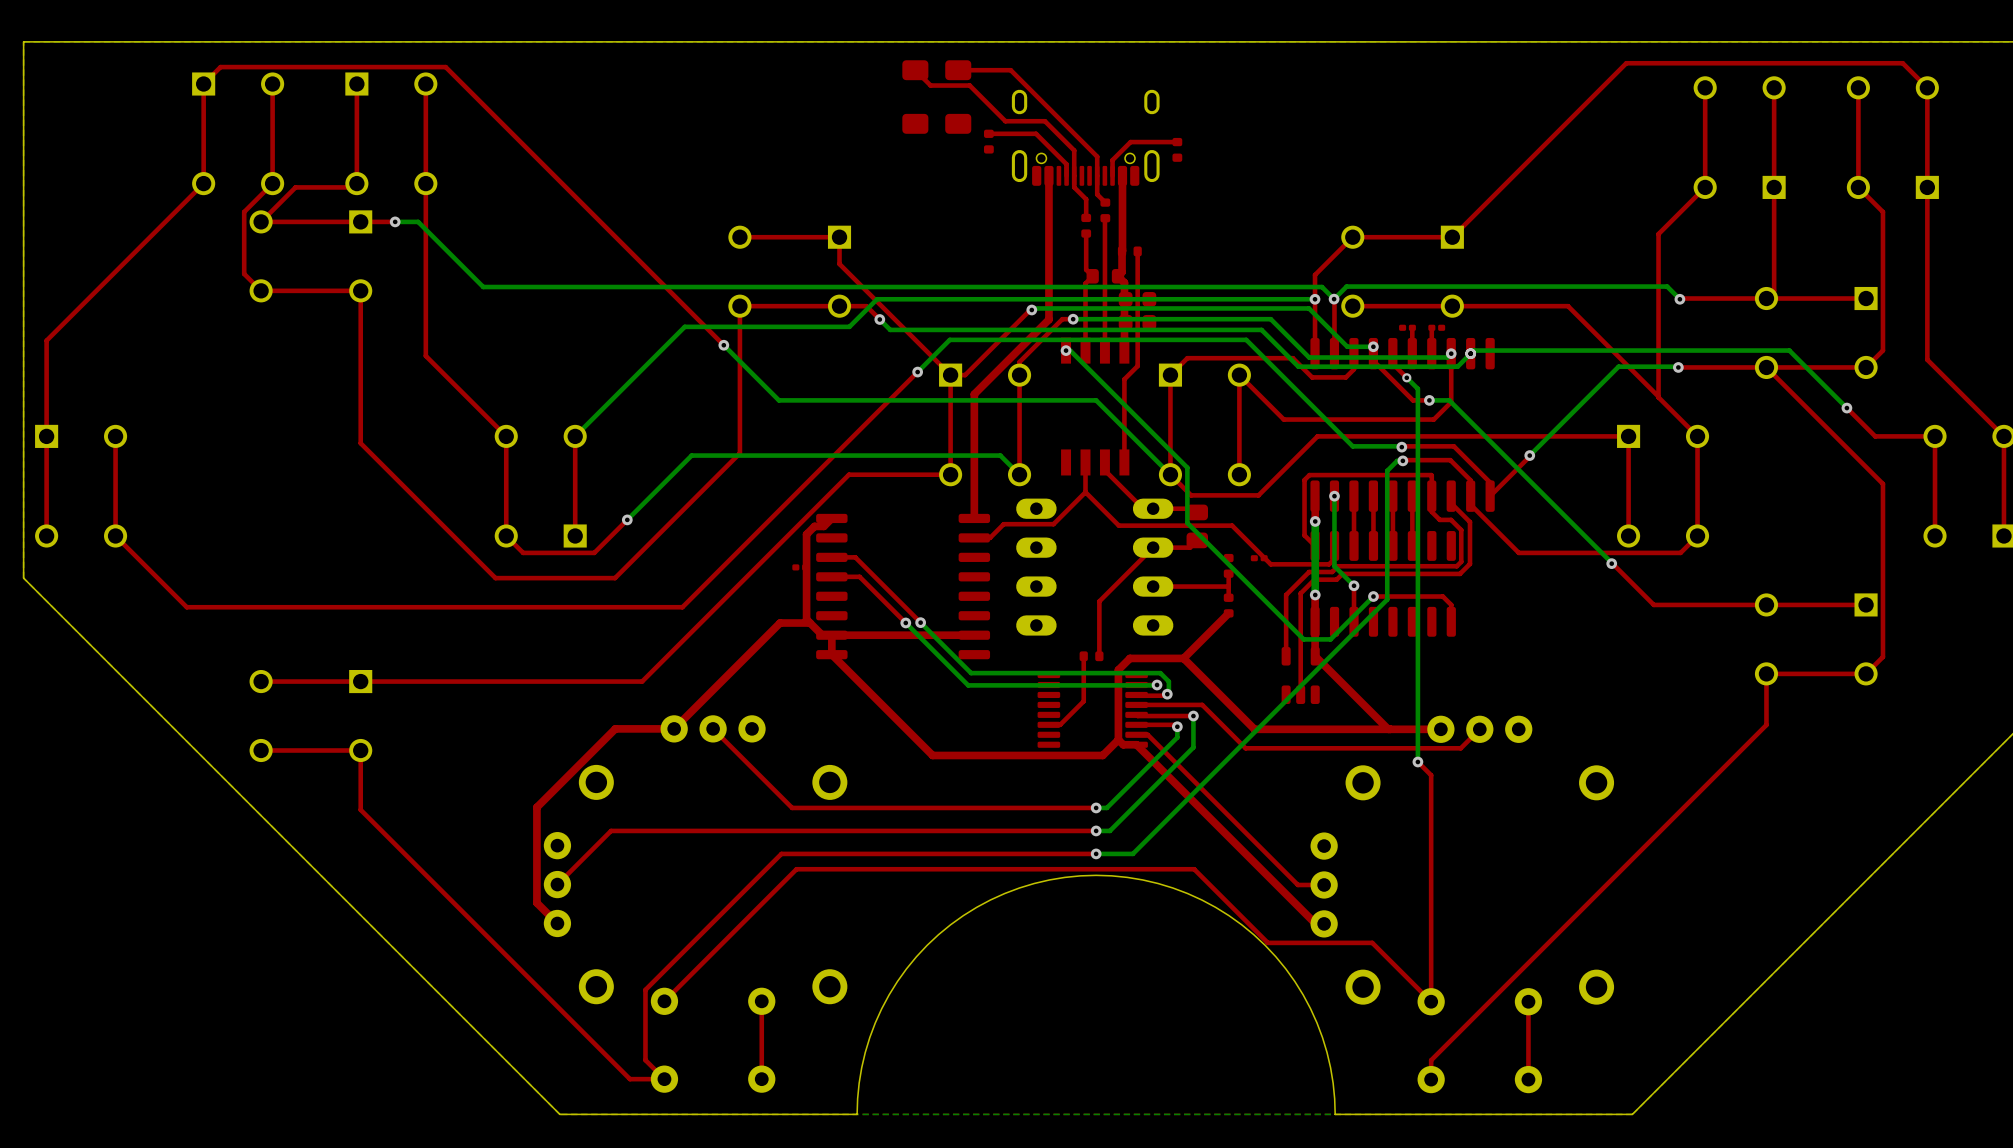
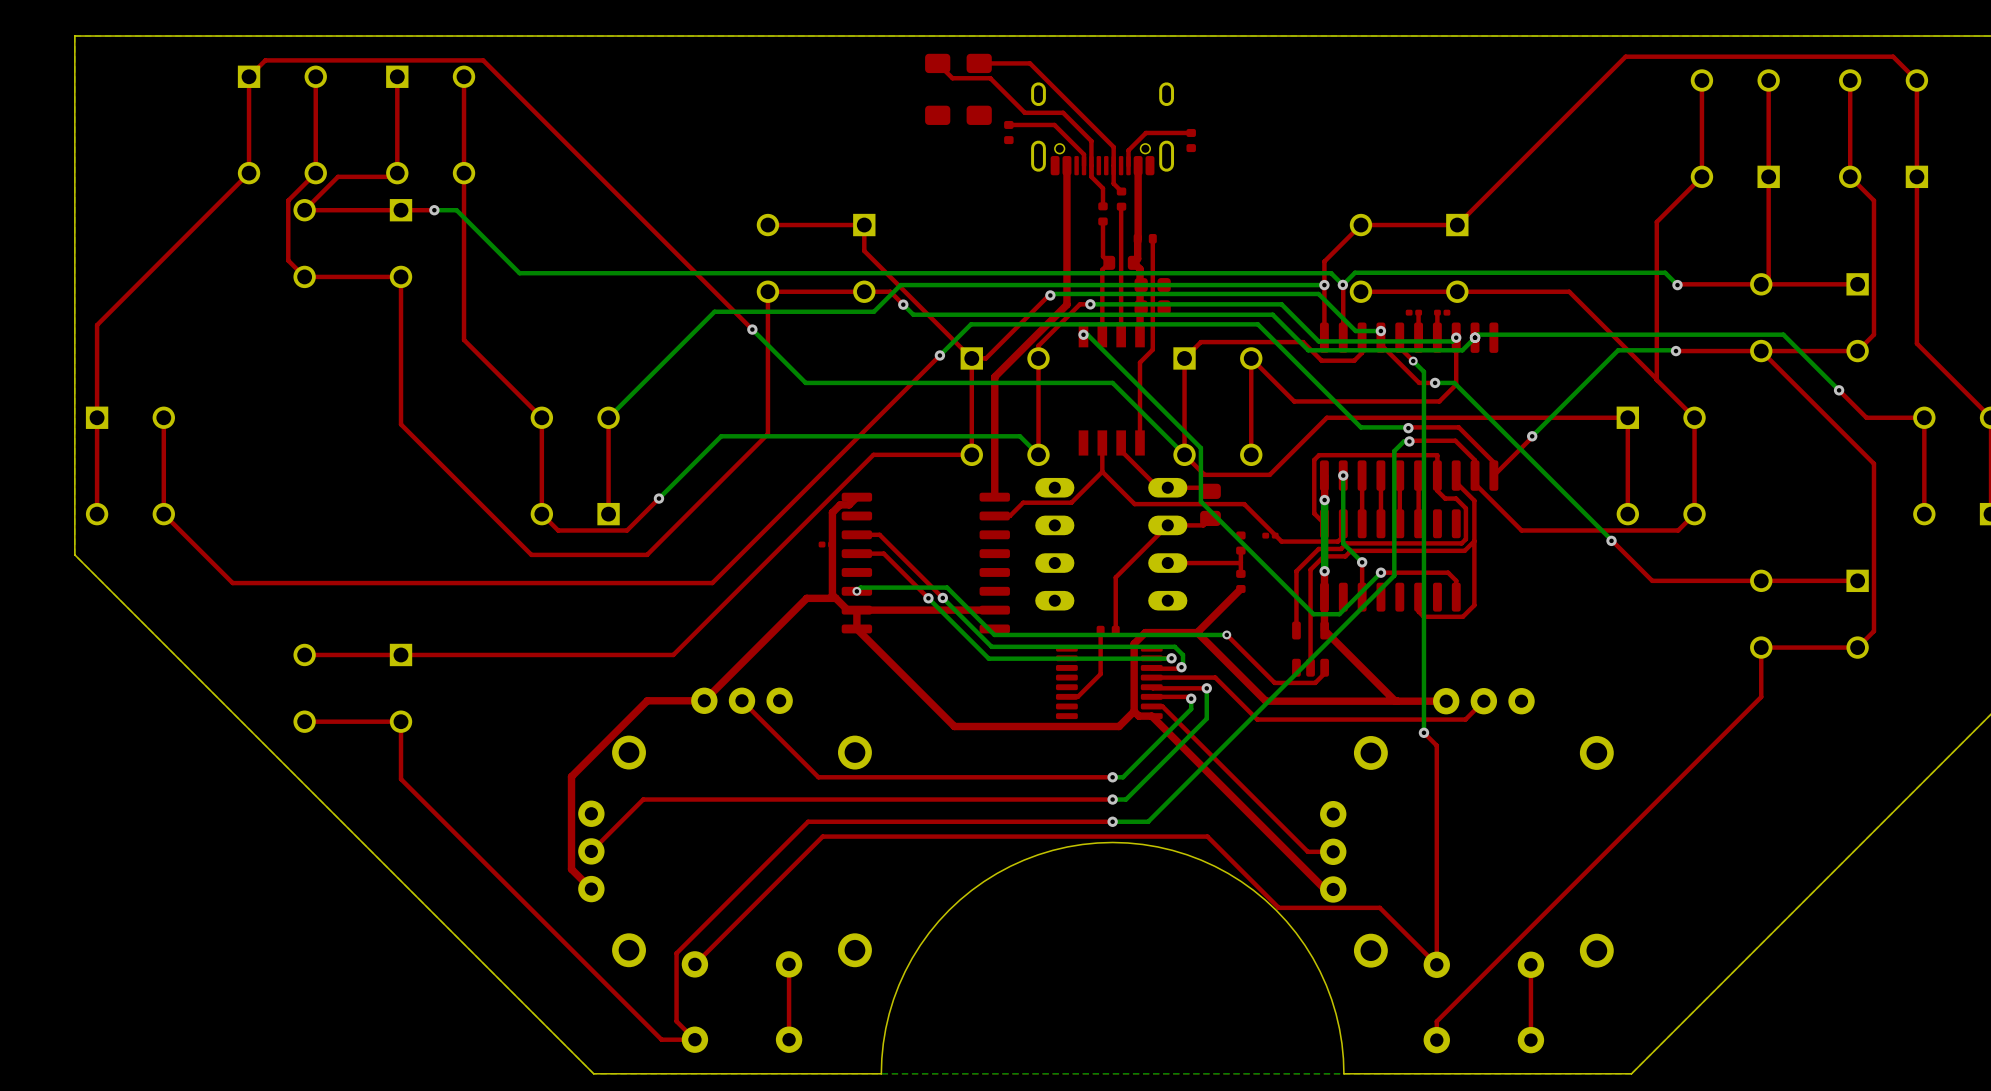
top track: none -> (1474, 541) (1474, 605) (1462, 616) (1423, 616) (1418, 611) (1418, 597)
bottom track: none -> (856, 591) (860, 587) (947, 587) (994, 634) (1226, 634)
via: none -> (856, 591)
top track: none -> (1226, 634) (1274, 682) (1315, 682) (1324, 673) (1324, 663)
via: none -> (1226, 634)

